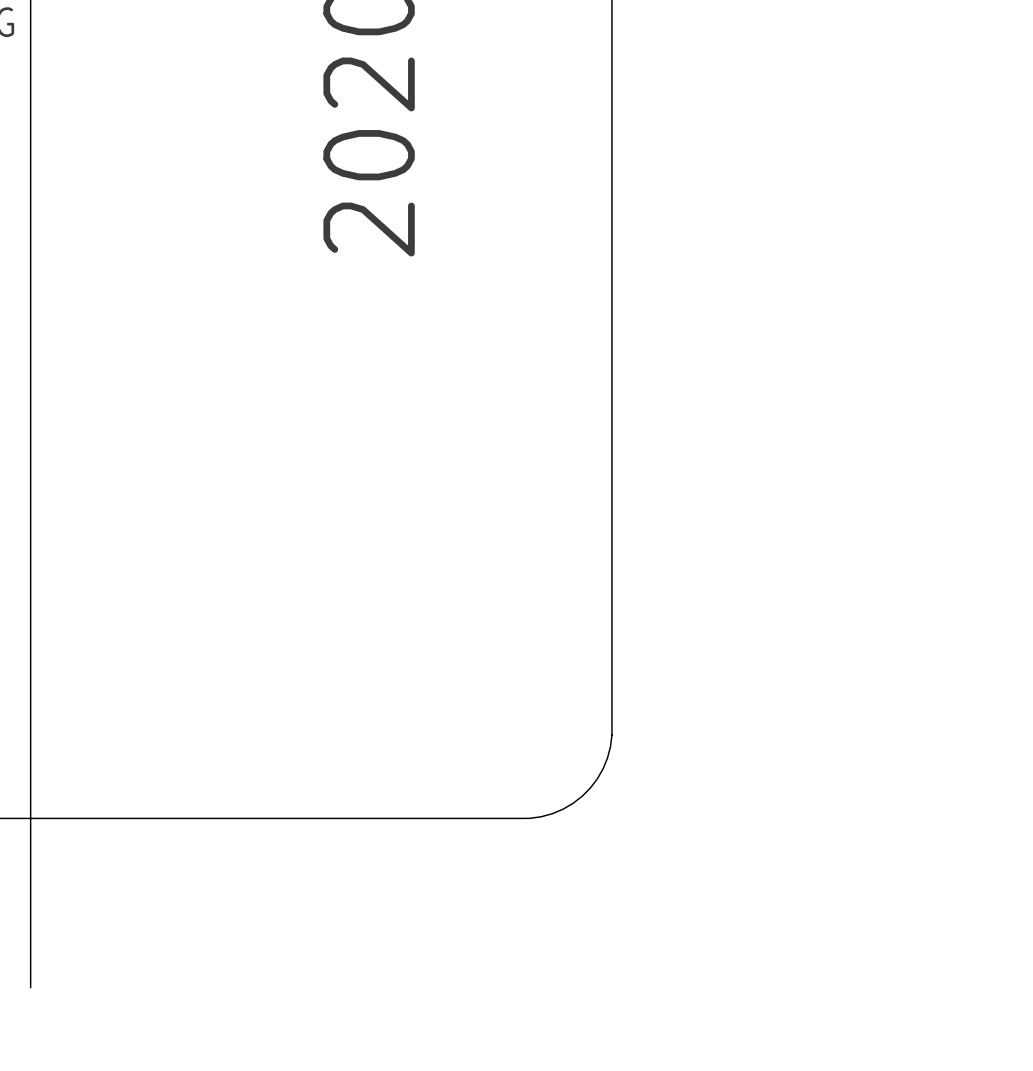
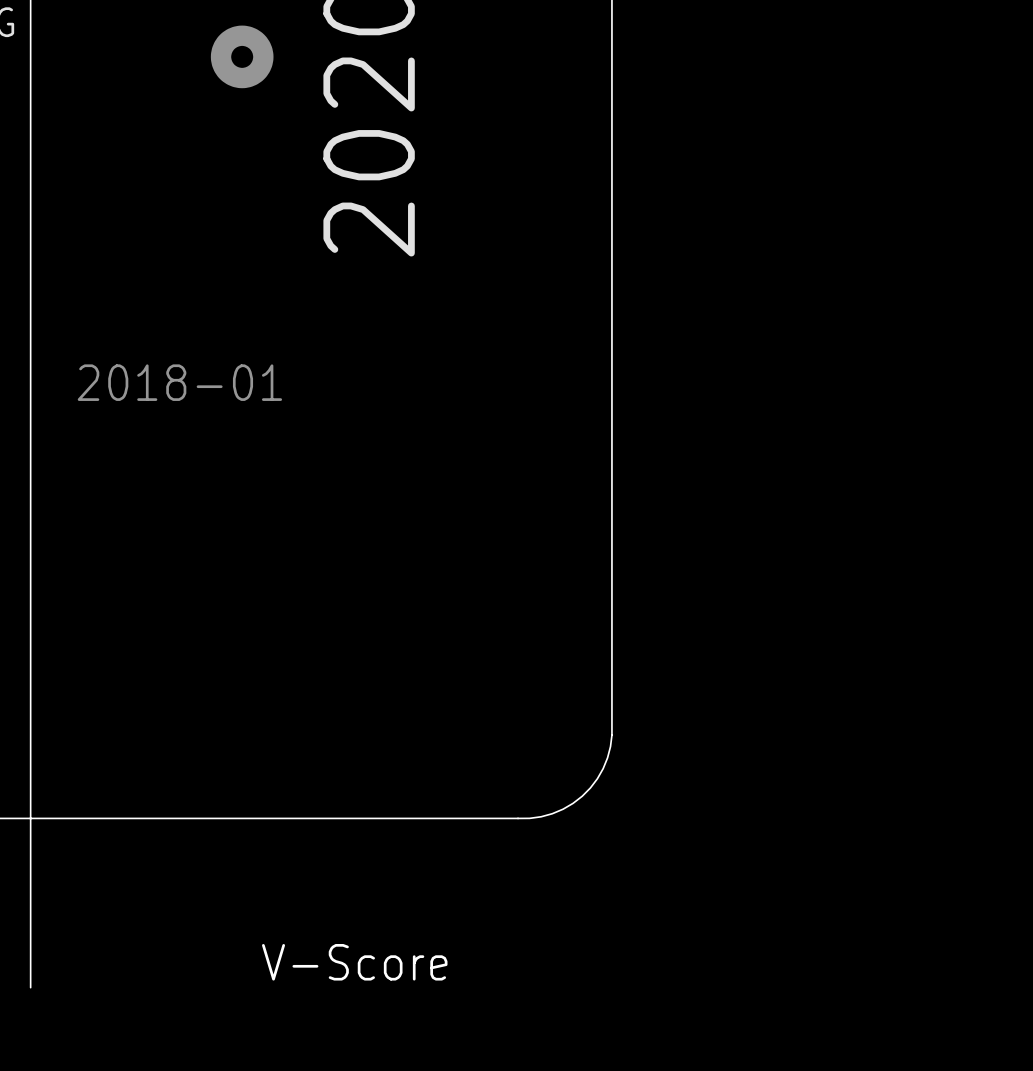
drawing: none -> [210, 25, 274, 89]
text: none -> 2018-01 (179, 382)
text: none -> V-Score (354, 962)

